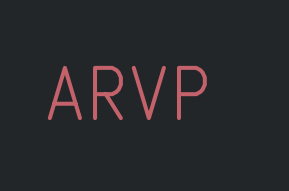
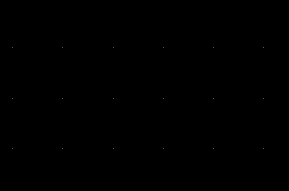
part: (127, 92) -> none

